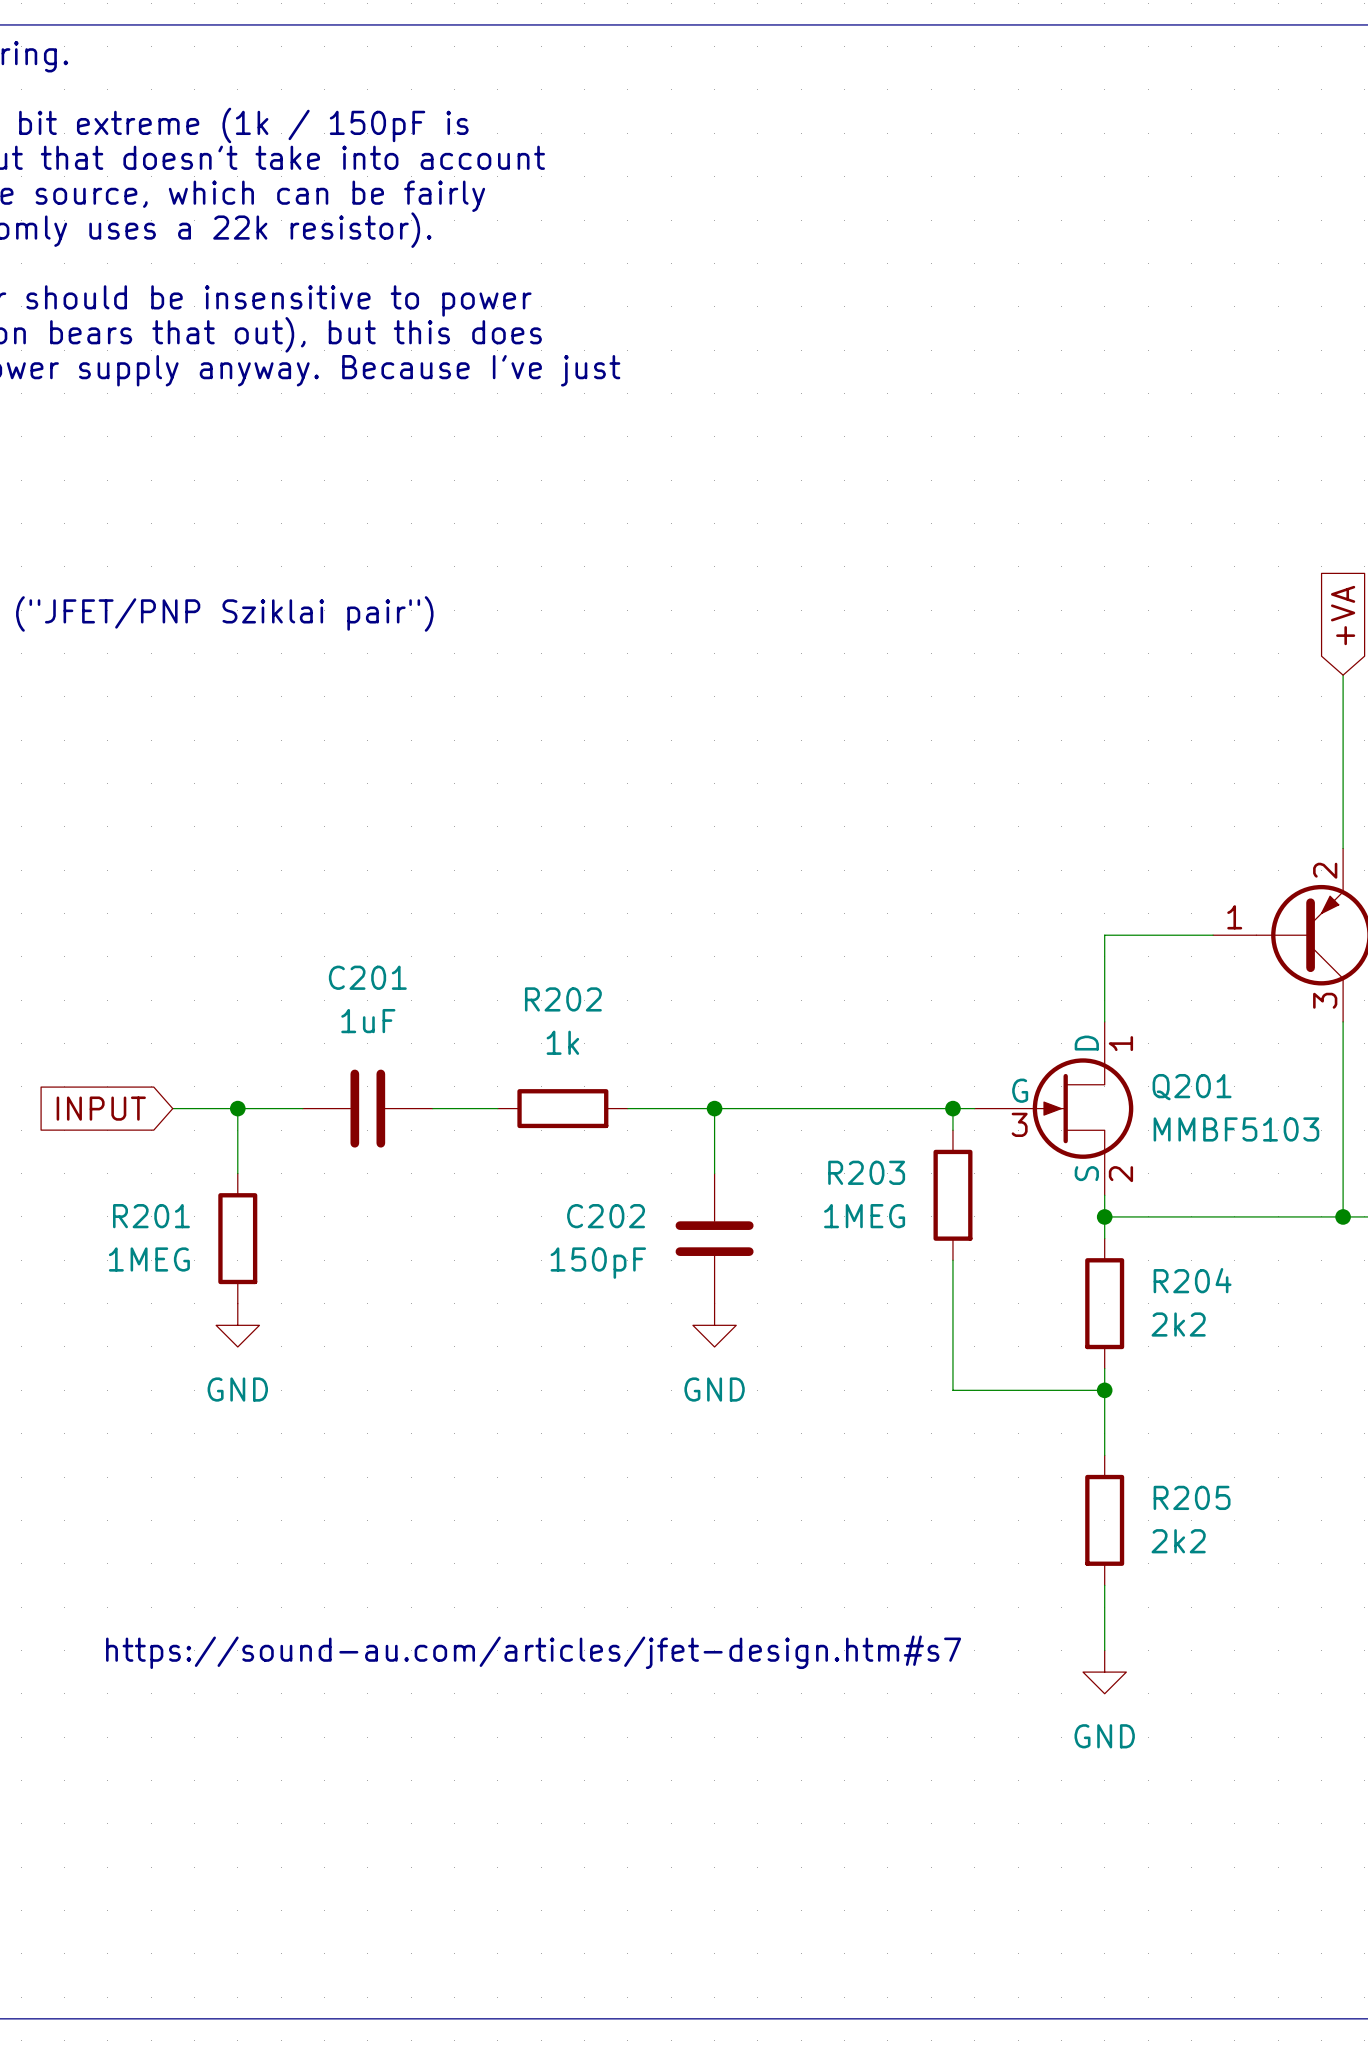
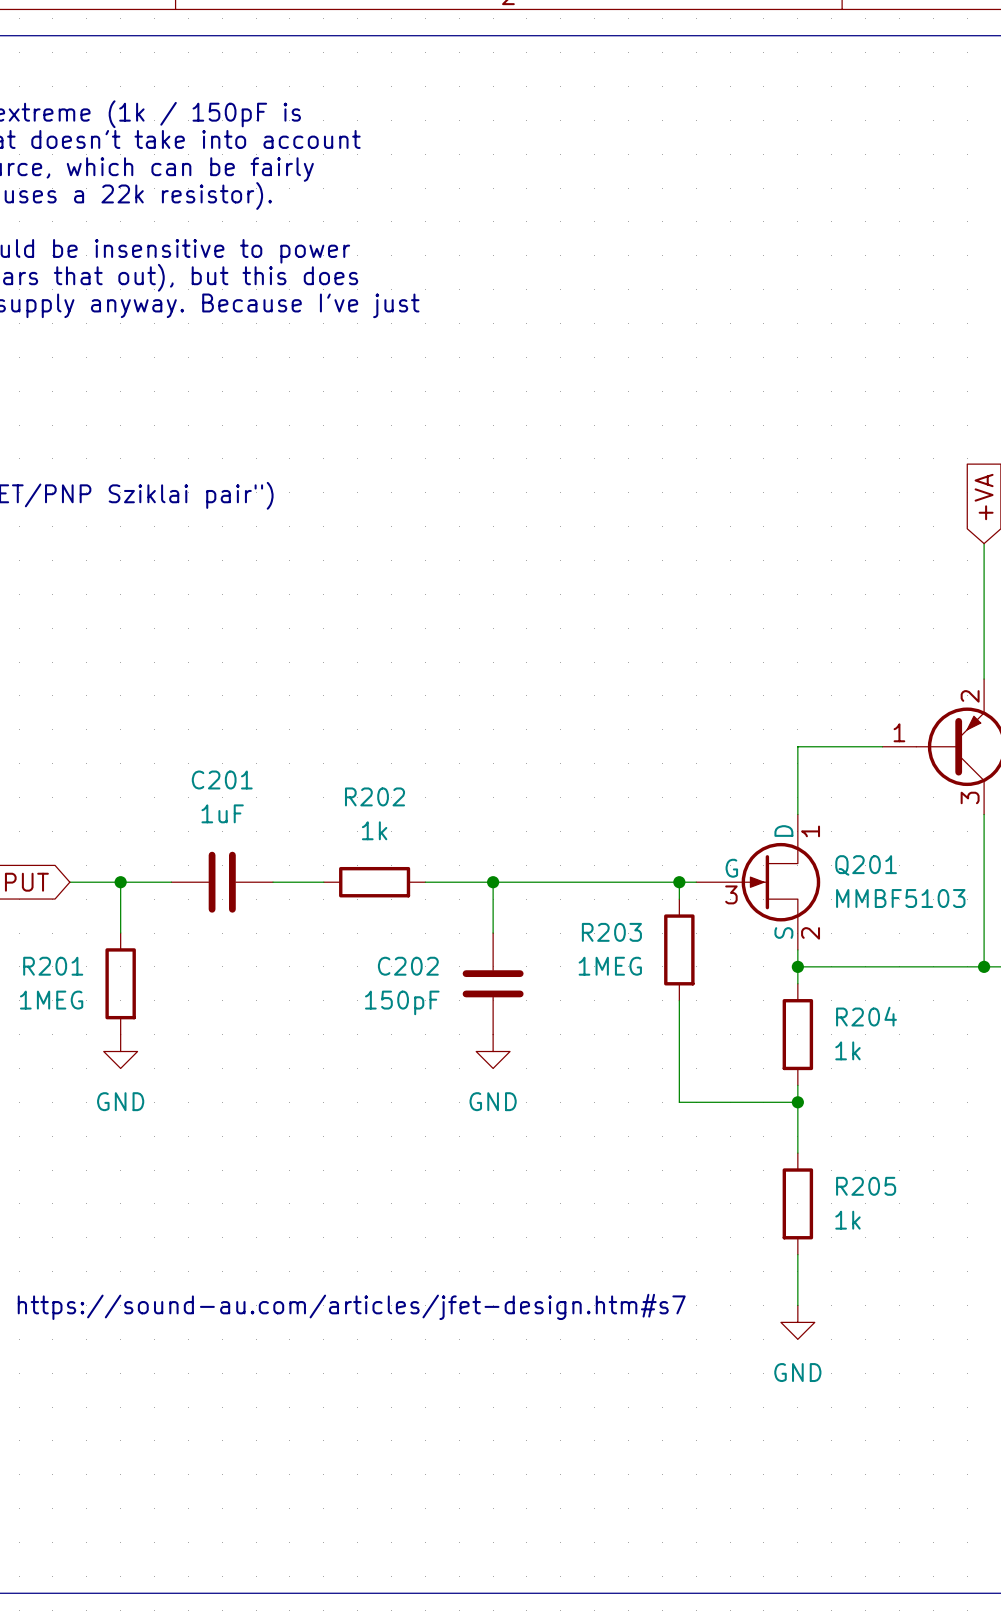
R204 value: 2k2 (1178, 1324) -> 1k (847, 1050)
R205 value: 2k2 (1178, 1541) -> 1k (847, 1220)

